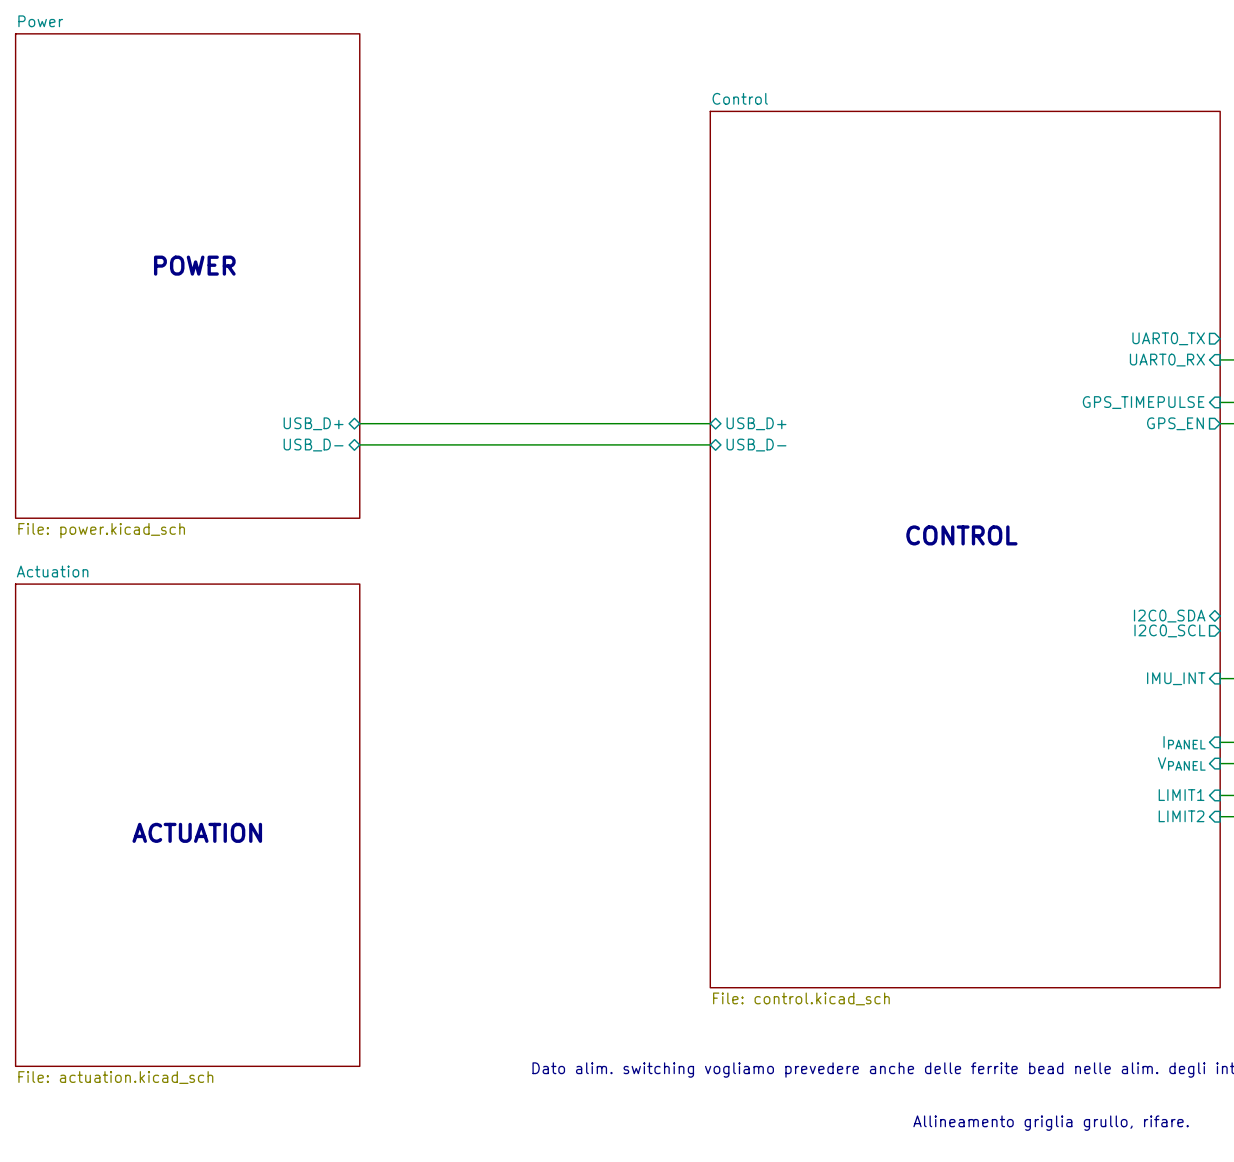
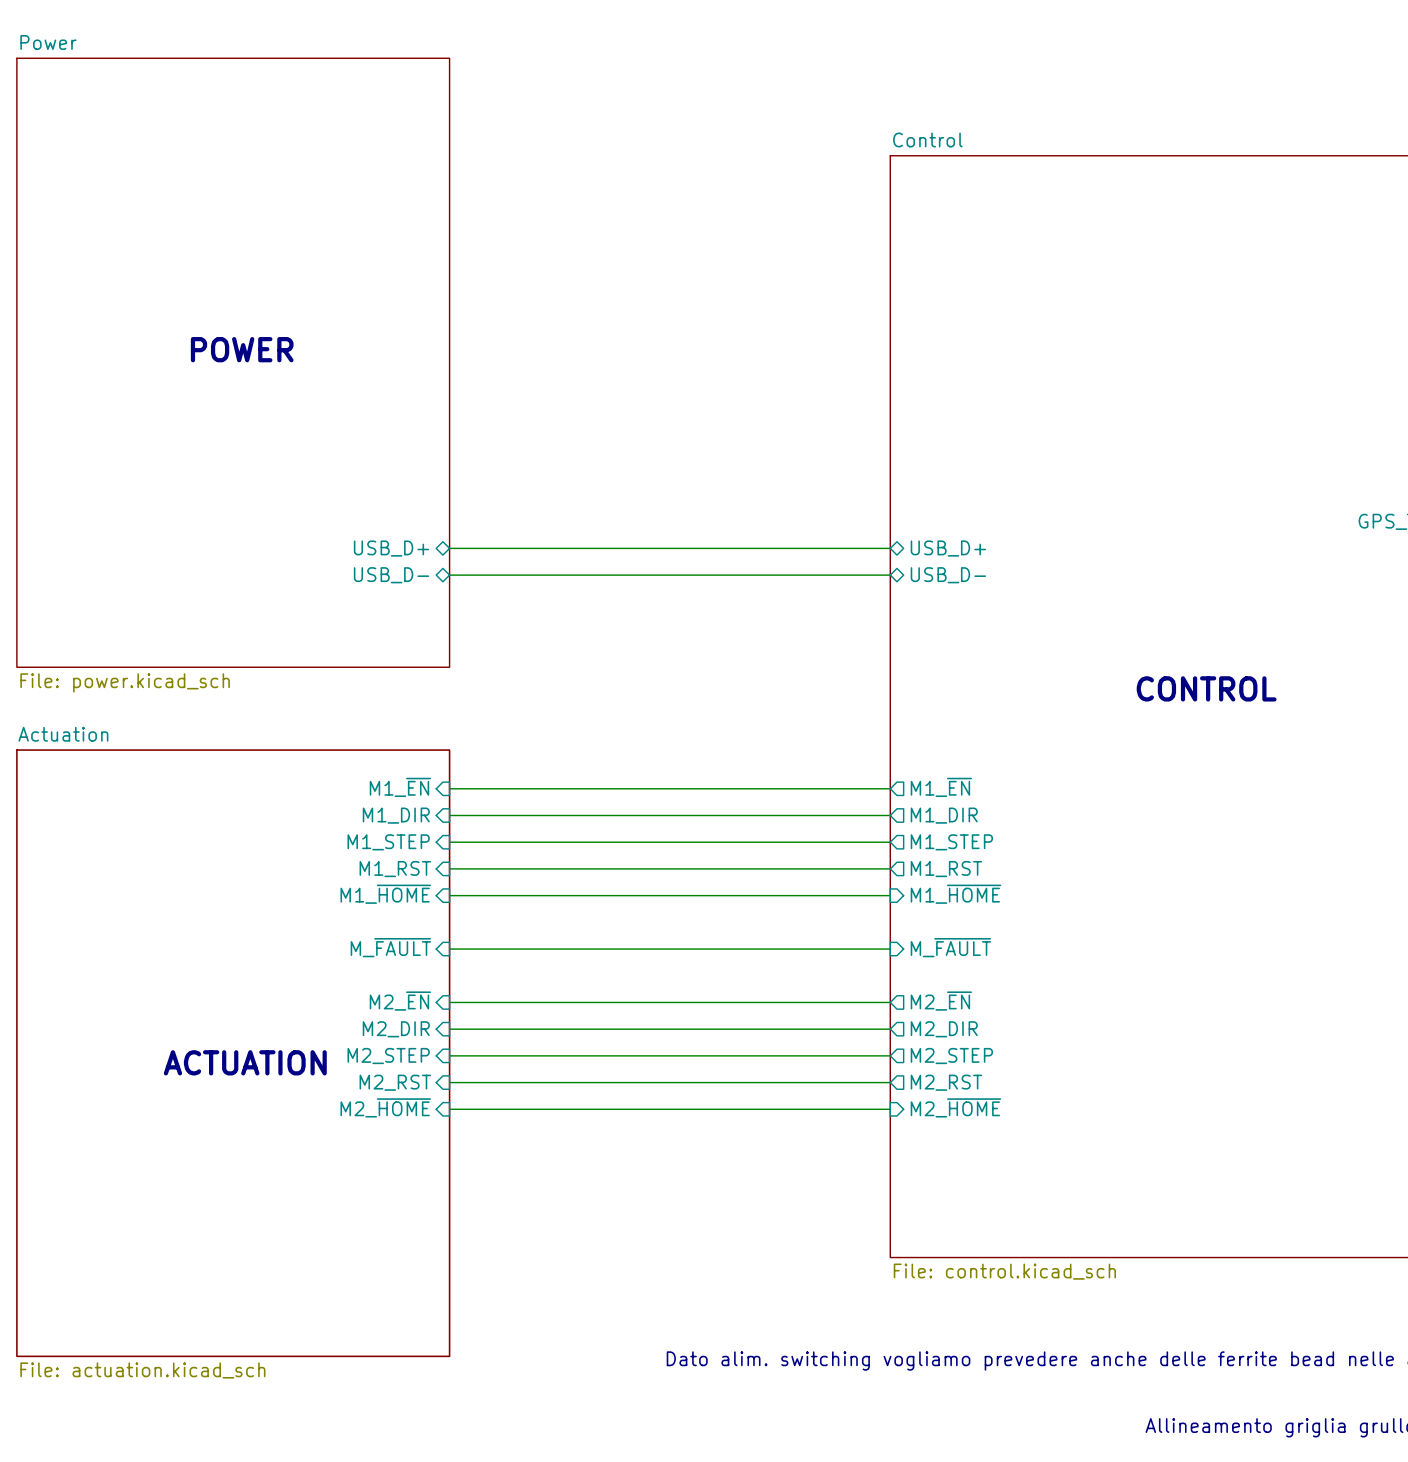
sheet pin: none -> M1_~{EN} (400, 787)
sheet pin: none -> M1_~{EN} (941, 787)
wire: none -> (449, 788) (890, 788)
sheet pin: none -> M1_DIR (396, 815)
wire: none -> (449, 815) (890, 815)
sheet pin: none -> M1_DIR (944, 815)
sheet pin: none -> M1_STEP (388, 842)
wire: none -> (449, 842) (890, 842)
sheet pin: none -> M1_STEP (951, 842)
sheet pin: none -> M1_RST (395, 869)
wire: none -> (449, 868) (890, 868)
sheet pin: none -> M1_RST (946, 869)
sheet pin: none -> M1_~{HOME} (385, 894)
sheet pin: none -> M1_~{HOME} (955, 894)
wire: none -> (449, 895) (890, 895)
sheet pin: none -> M_~{FAULT} (390, 947)
sheet pin: none -> M_~{FAULT} (950, 947)
wire: none -> (449, 949) (890, 949)
sheet pin: none -> M2_~{EN} (400, 1001)
sheet pin: none -> M2_~{EN} (941, 1001)
wire: none -> (449, 1002) (890, 1002)
sheet pin: none -> M2_DIR (396, 1029)
wire: none -> (449, 1029) (890, 1029)
sheet pin: none -> M2_DIR (944, 1029)
sheet pin: none -> M2_STEP (388, 1056)
wire: none -> (449, 1055) (890, 1055)
sheet pin: none -> M2_STEP (951, 1056)
sheet pin: none -> M2_RST (395, 1082)
wire: none -> (449, 1082) (890, 1082)
sheet pin: none -> M2_RST (946, 1082)
sheet pin: none -> M2_~{HOME} (385, 1107)
sheet pin: none -> M2_~{HOME} (955, 1107)
wire: none -> (449, 1109) (890, 1109)

